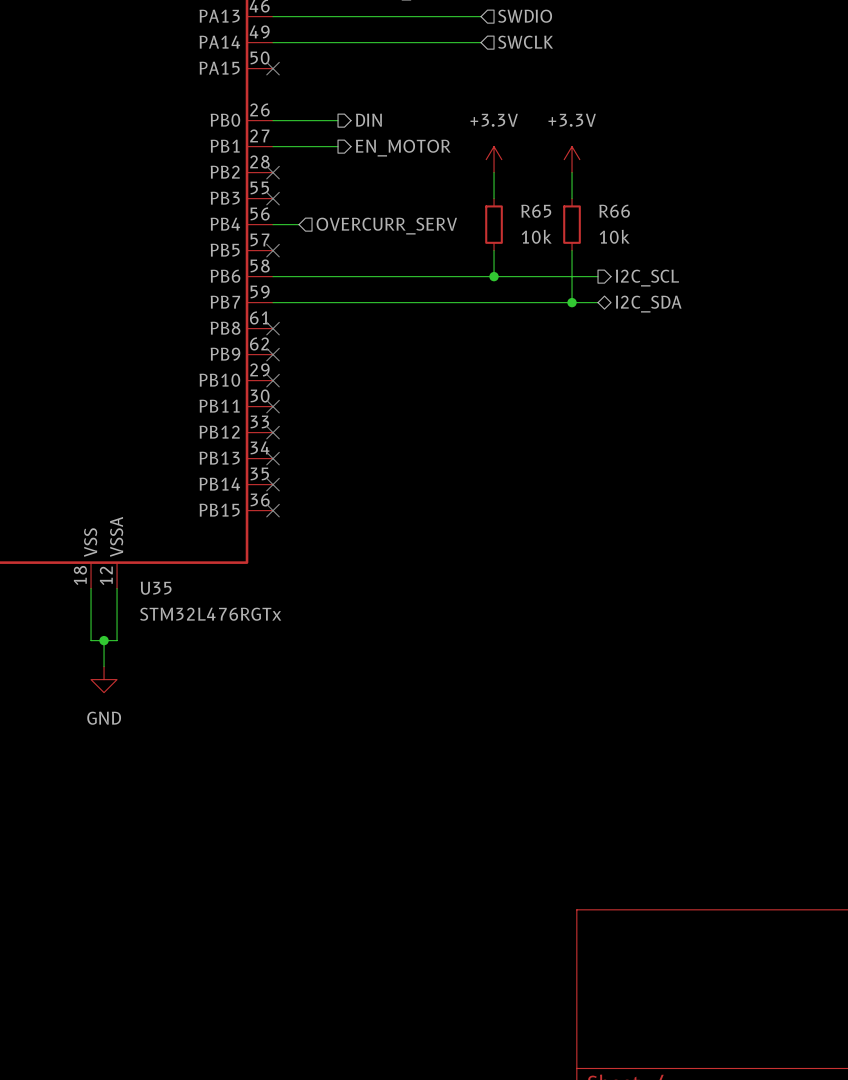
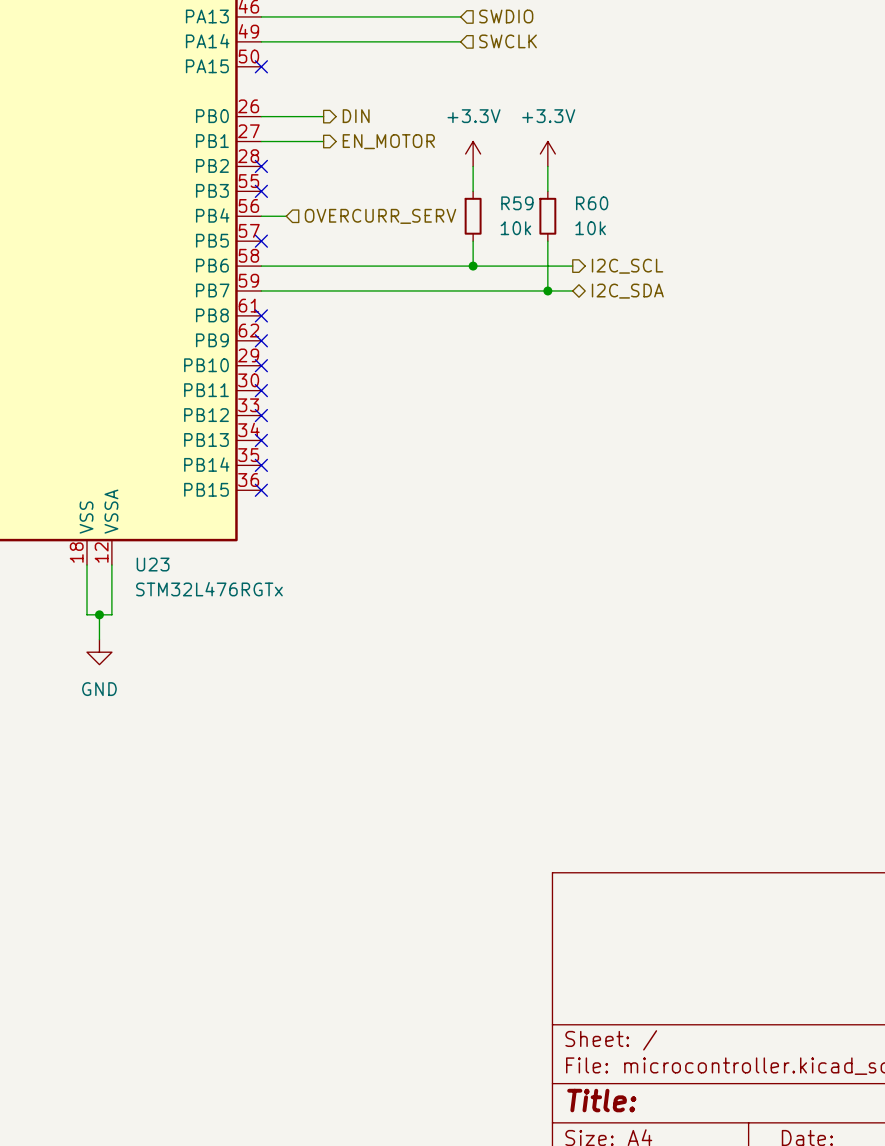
R65 name: R65 (536, 211) -> R59 (517, 203)
R66 name: R66 (614, 211) -> R60 (592, 203)
U35 name: U35 (156, 588) -> U23 (153, 564)

